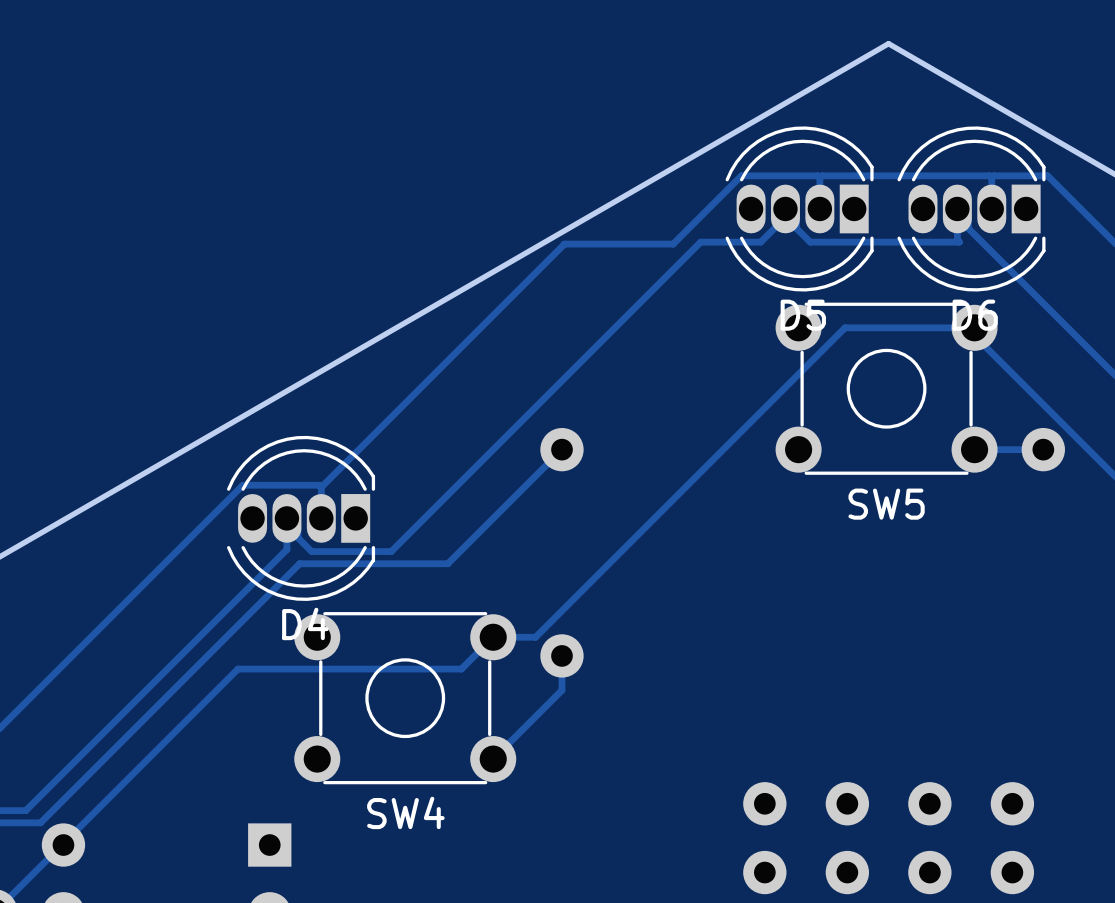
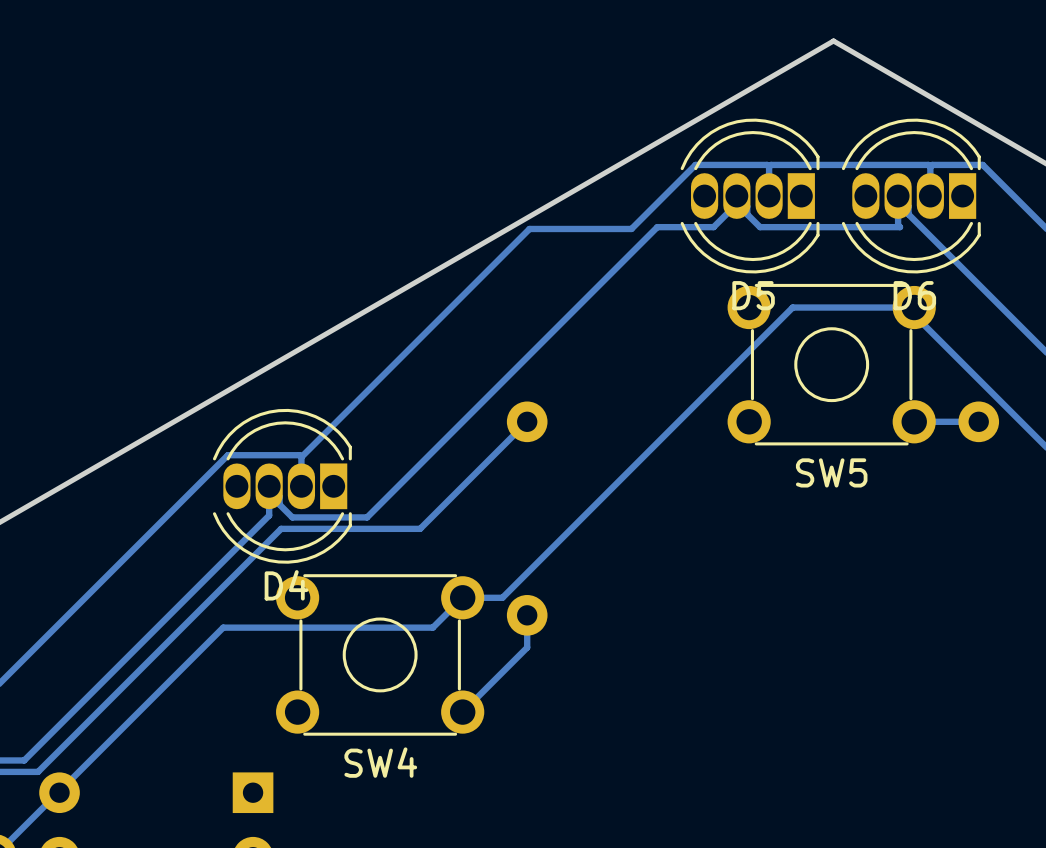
part: (764, 838) -> none
part: (847, 838) -> none
part: (929, 838) -> none
part: (1012, 838) -> none

